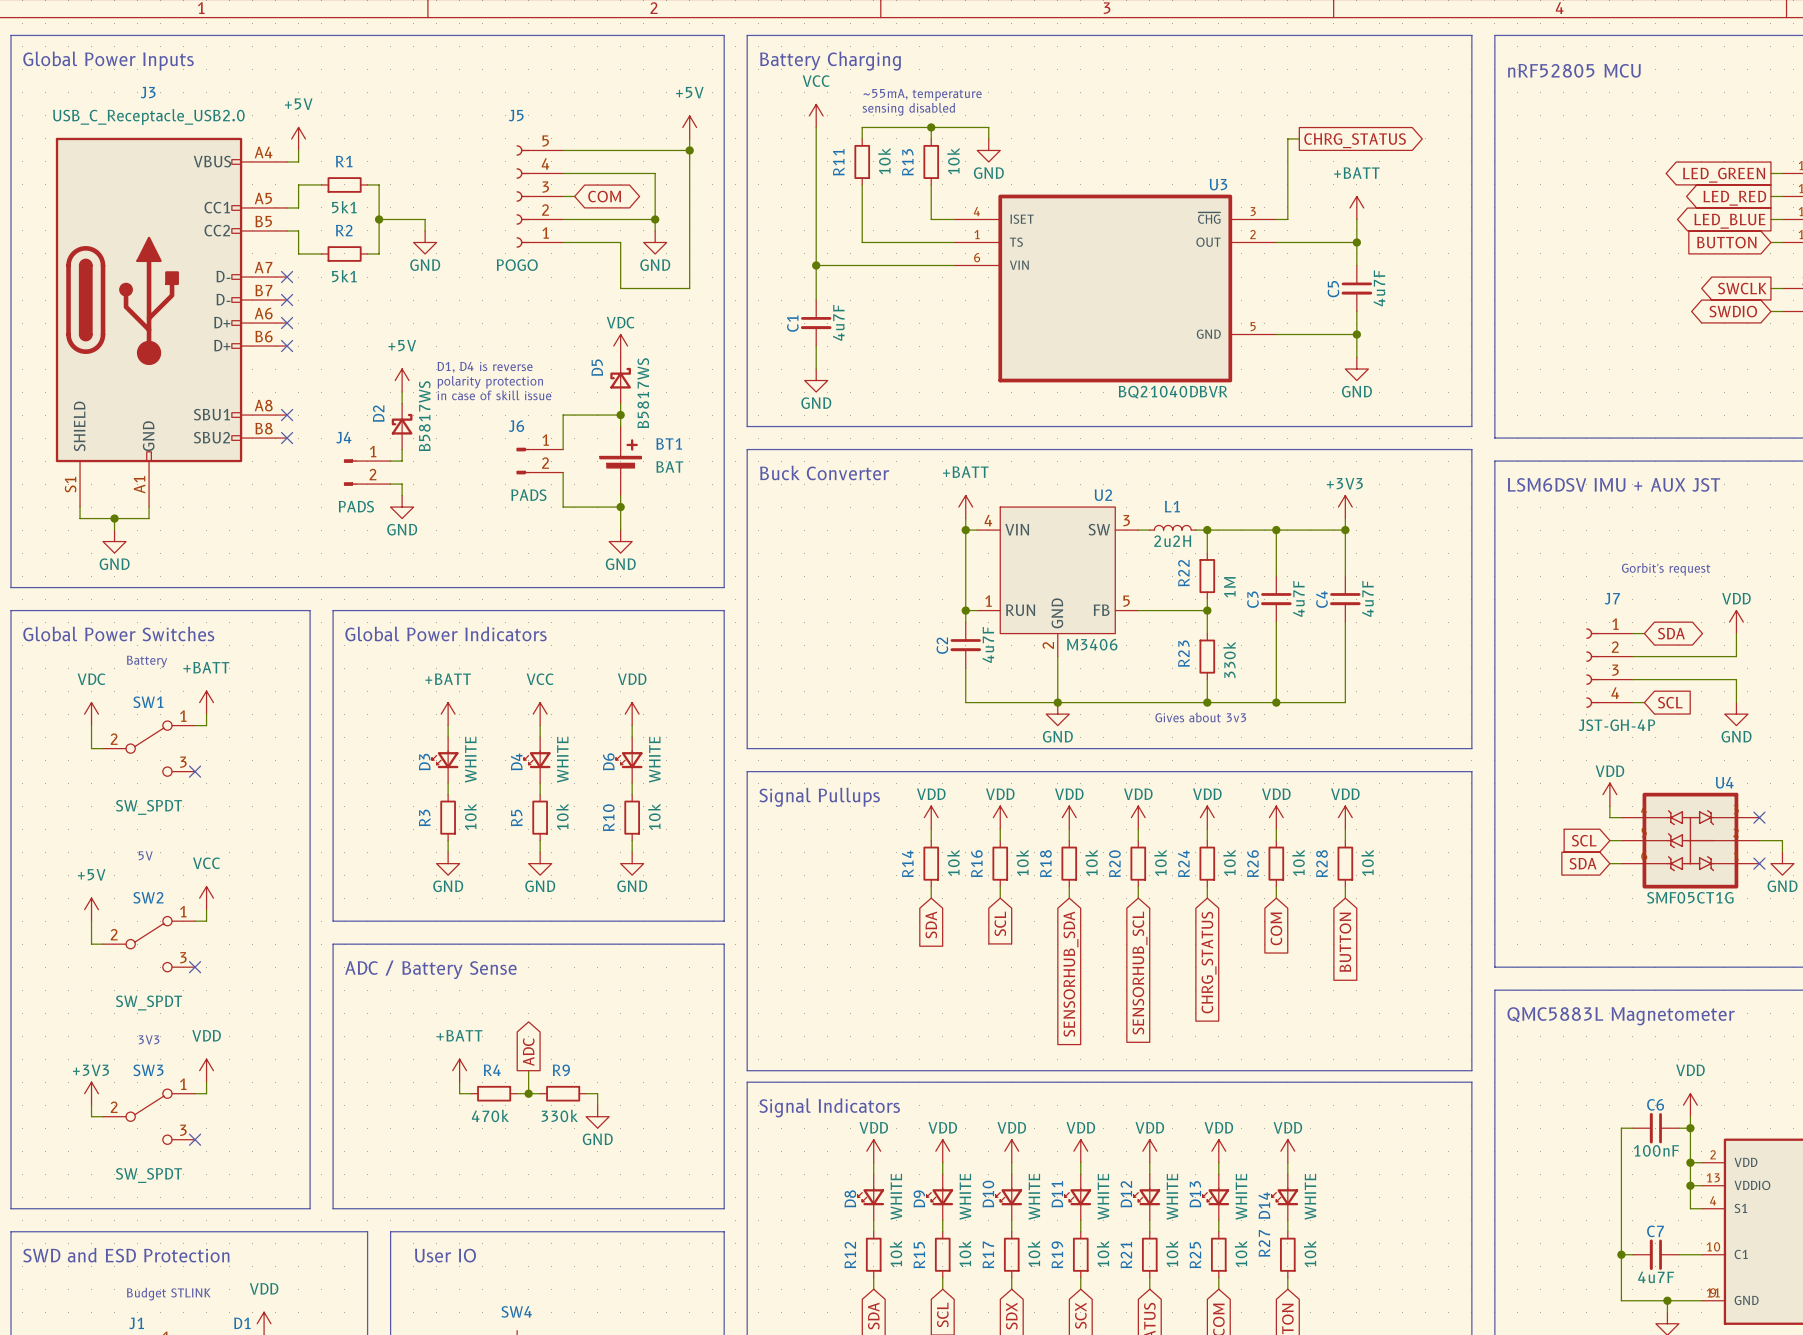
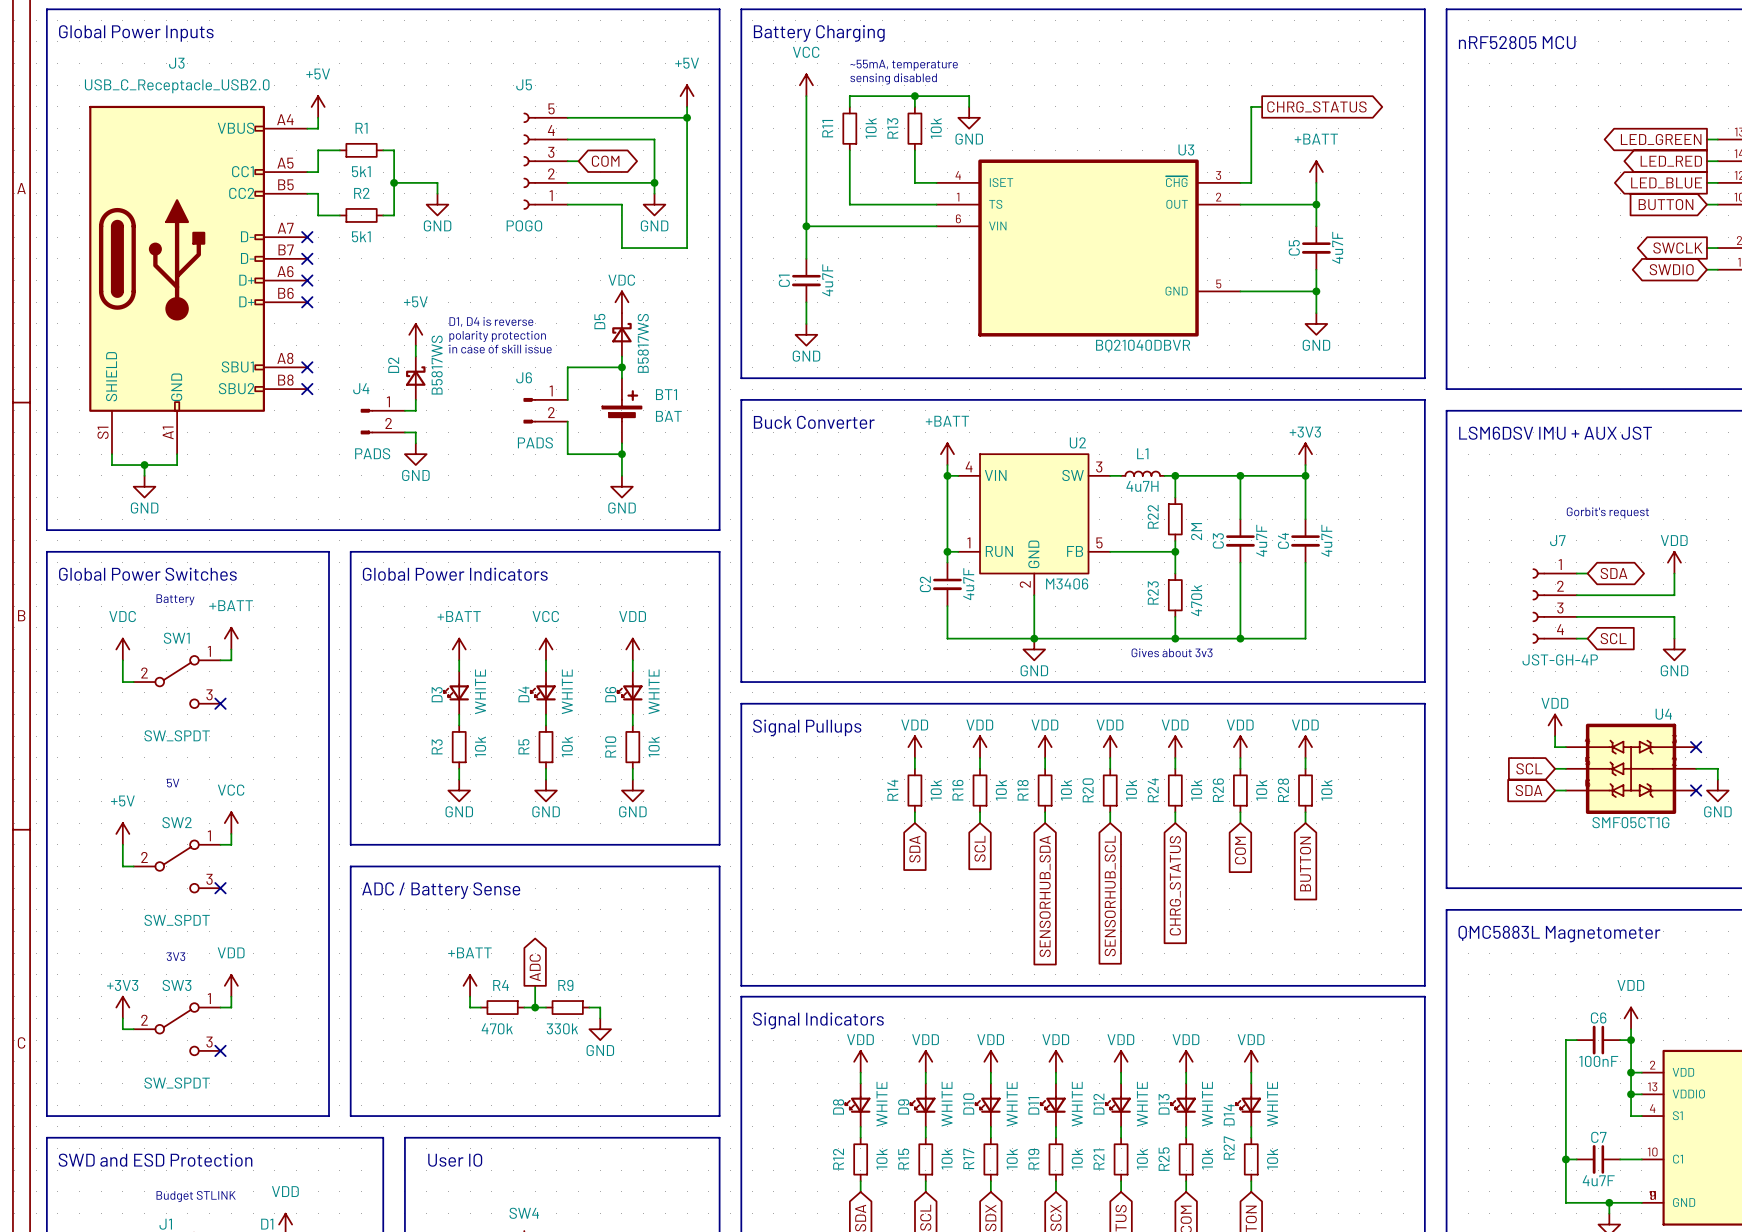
L1 value: 2u2H (1172, 541) -> 4u7H (1142, 486)
R22 value: 1M (1229, 587) -> 2M (1196, 531)
R23 value: 330k (1229, 659) -> 470k (1196, 600)

